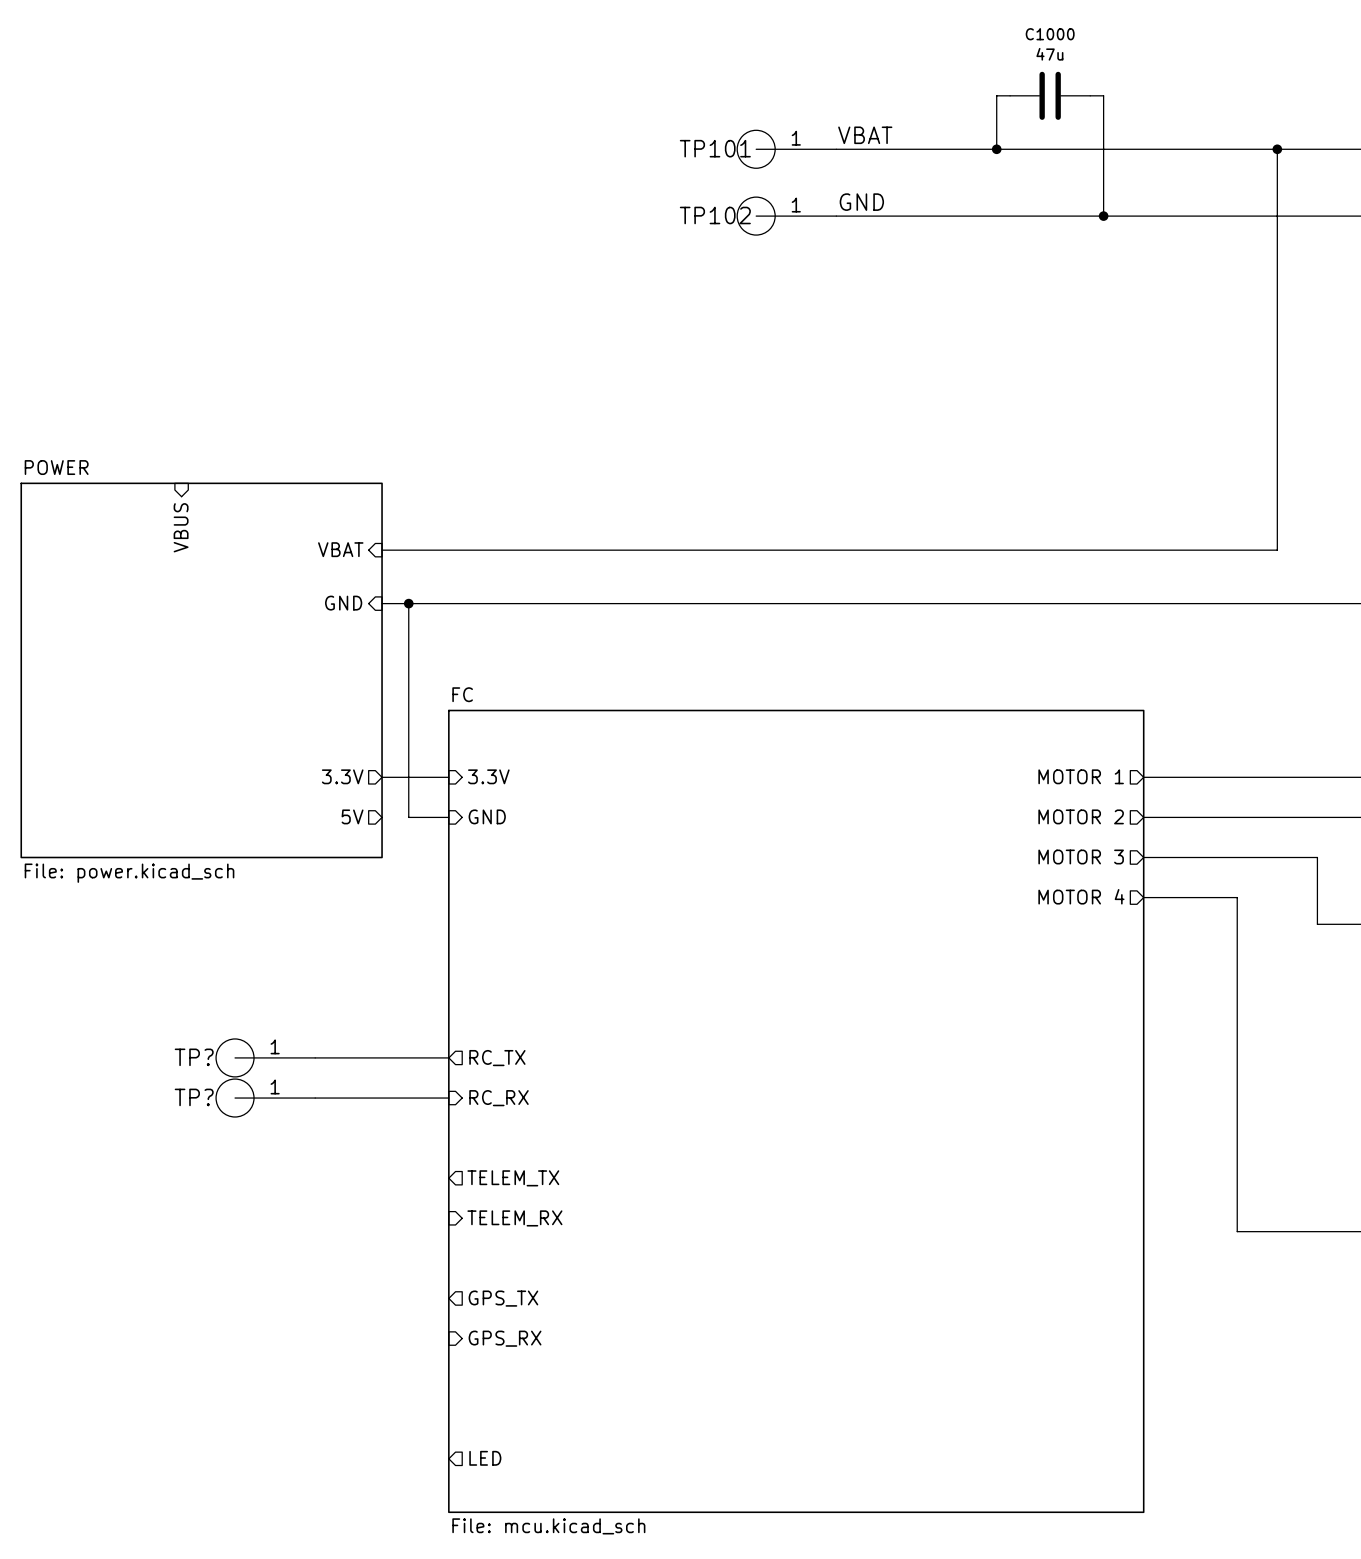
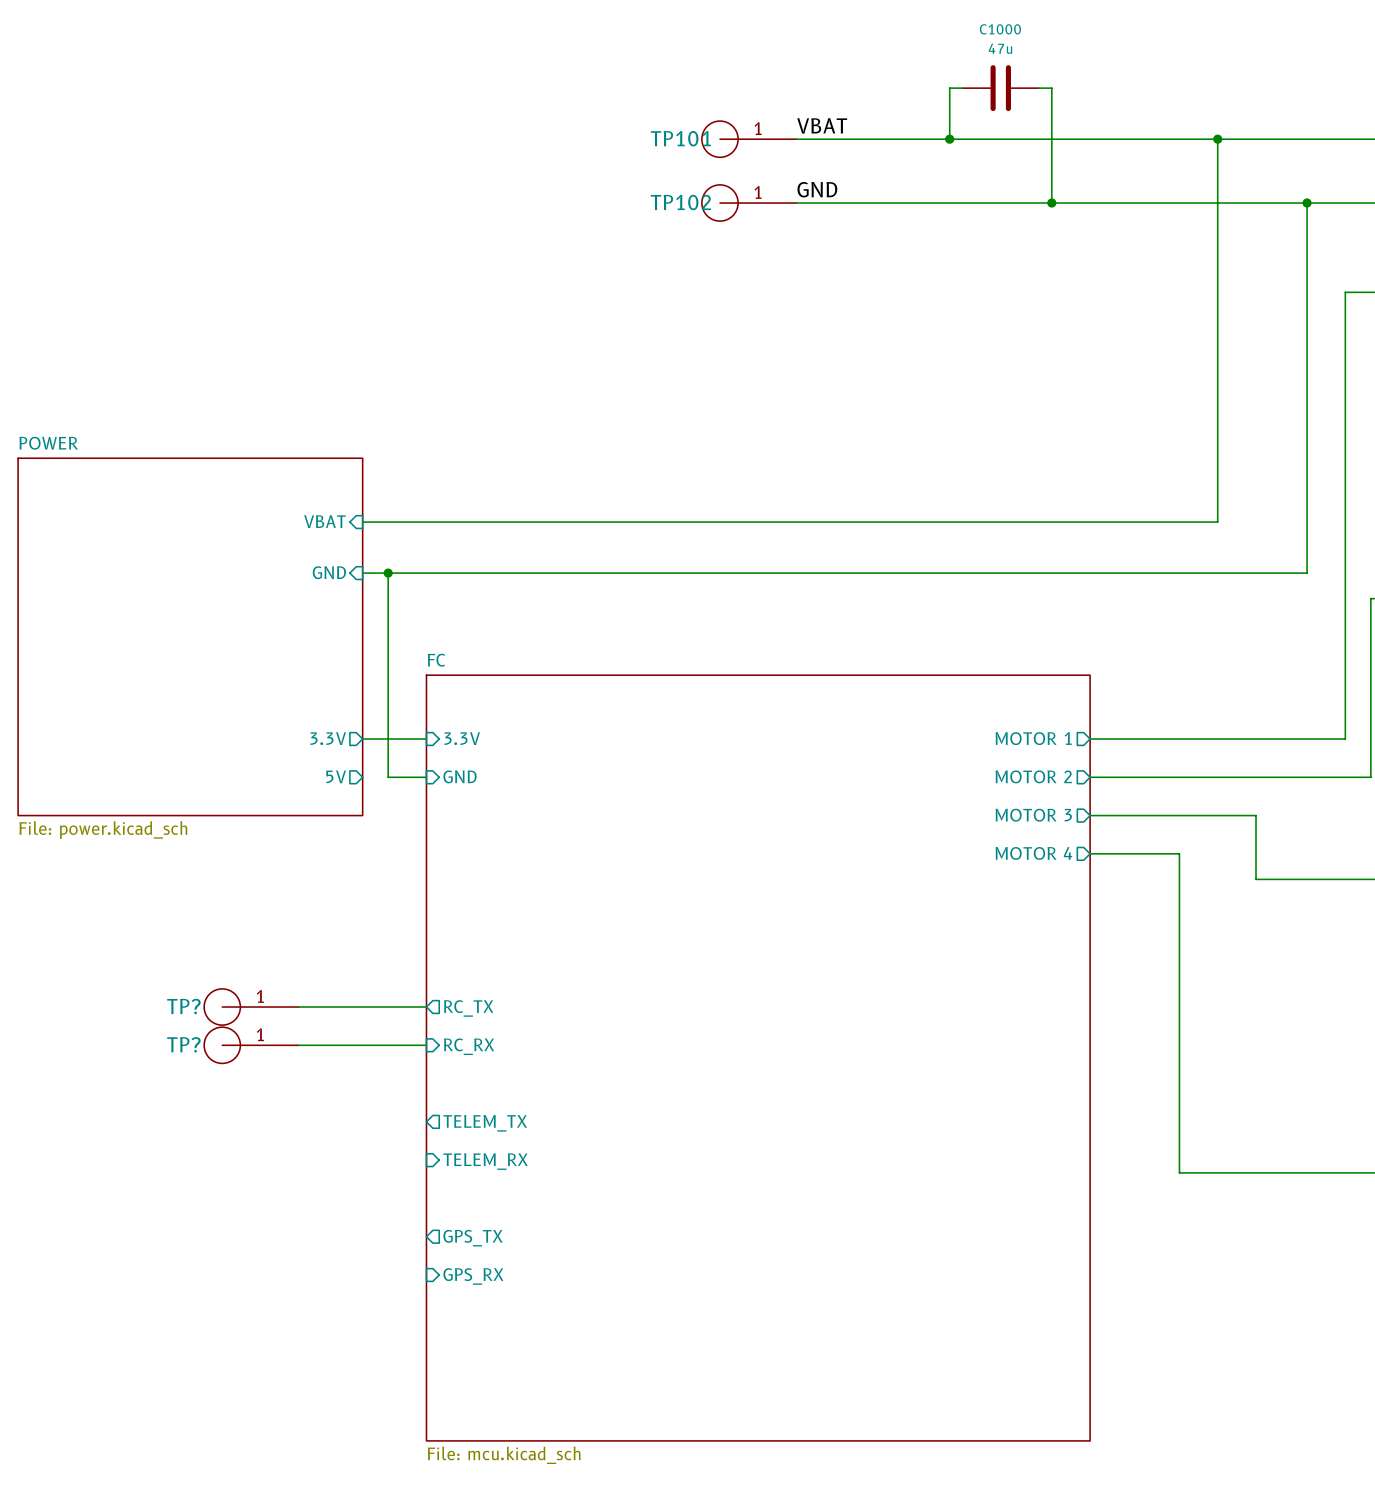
sheet pin: VBUS (181, 527) -> none
sheet pin: LED (485, 1458) -> none

